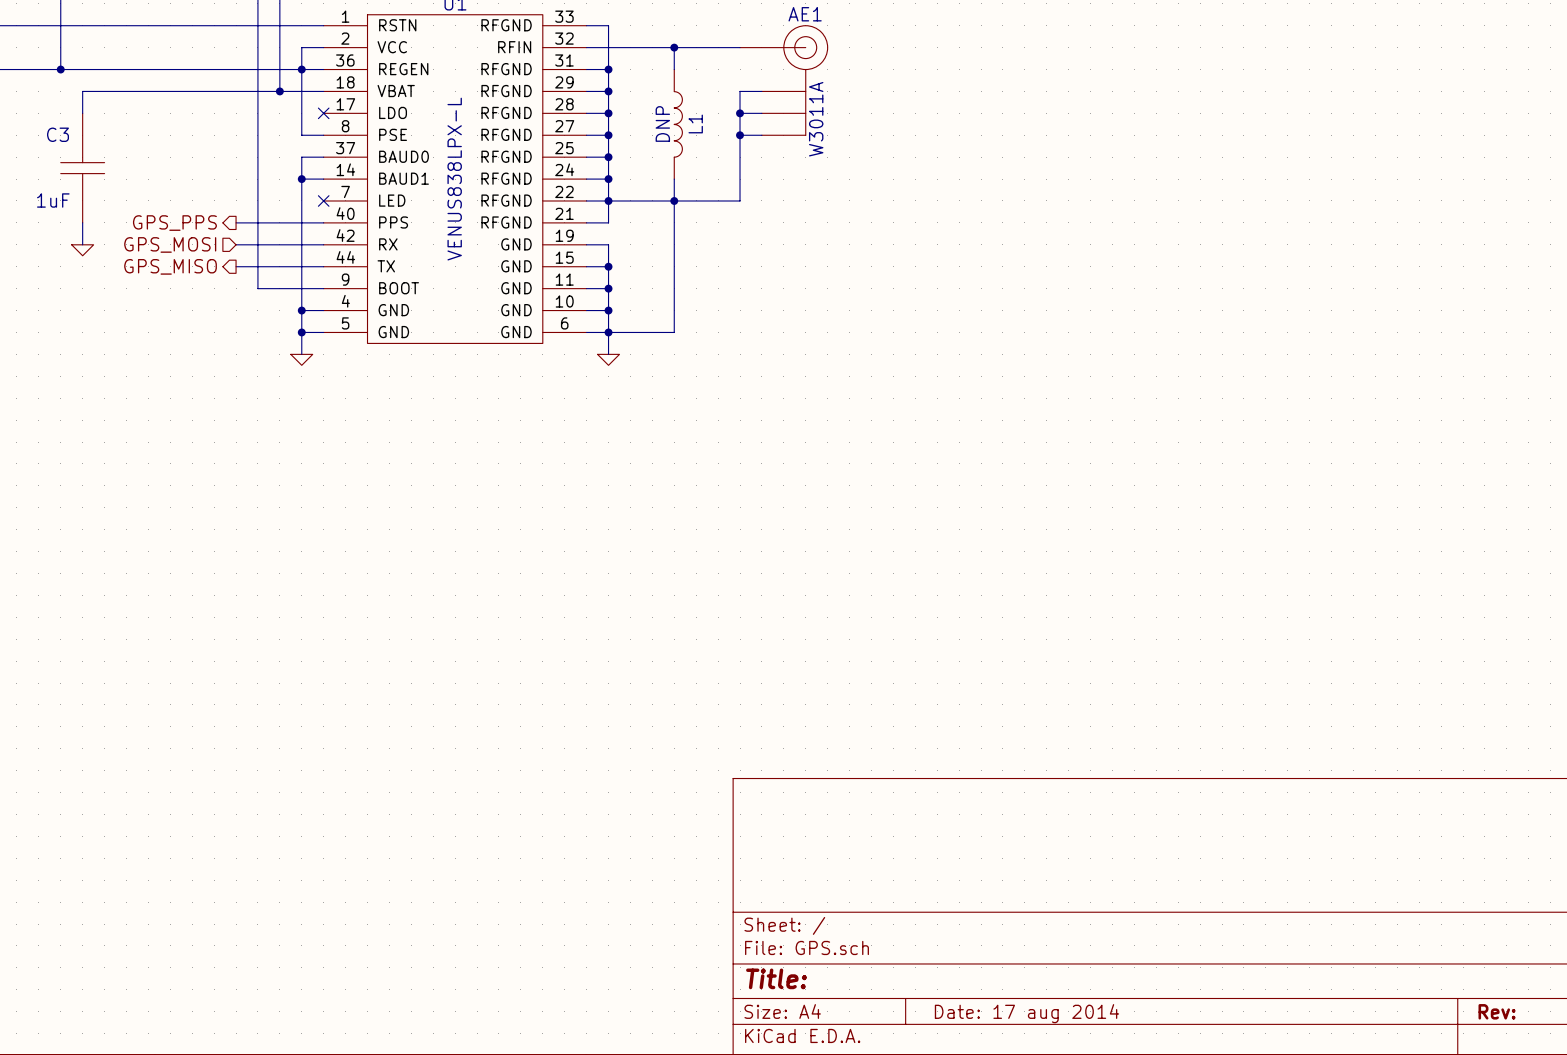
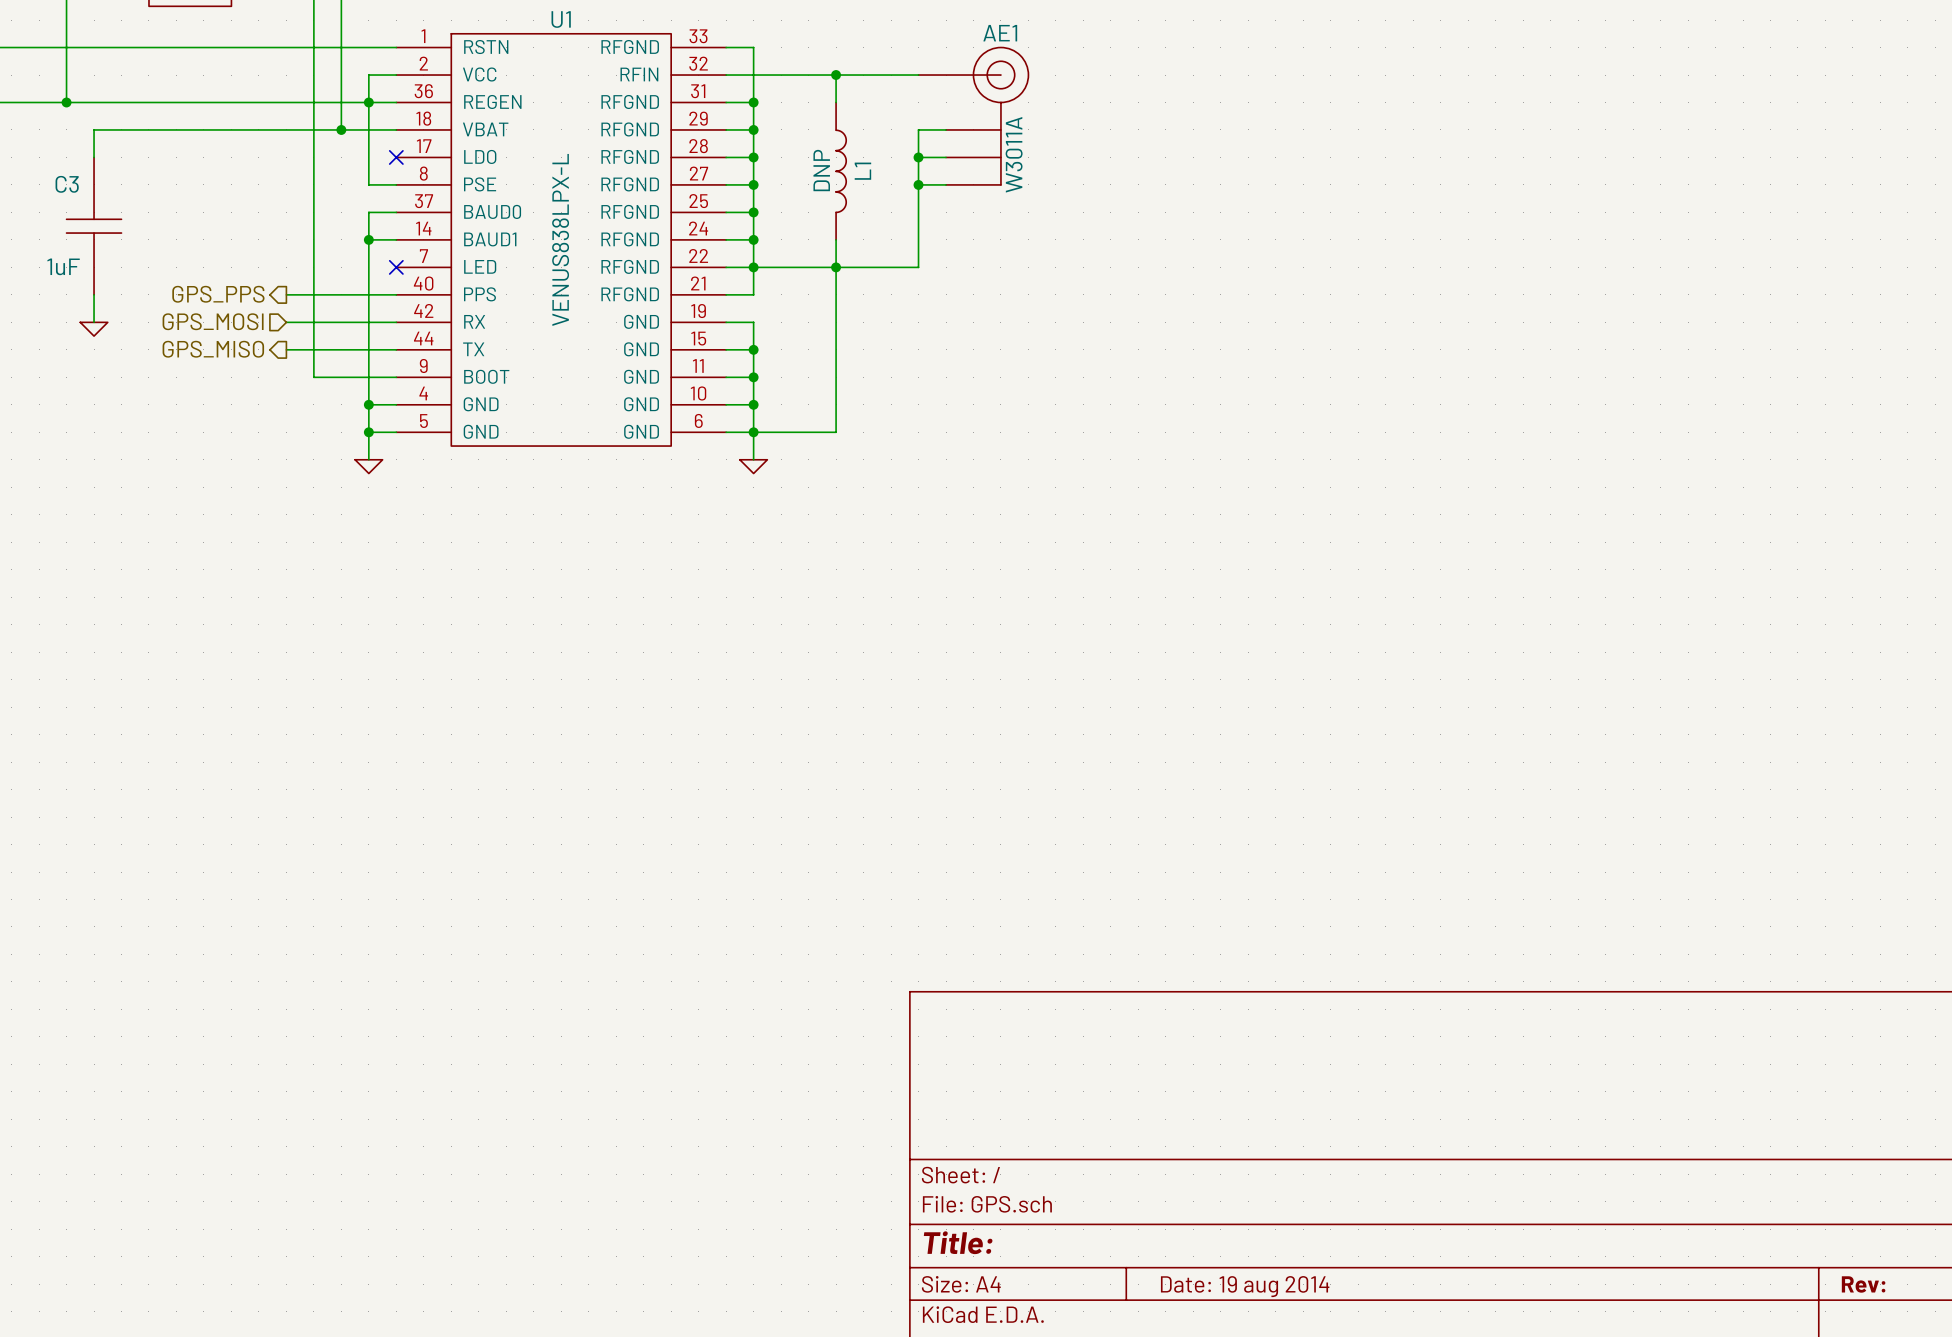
title block: Date: 17 aug 2014 (1026, 1013) -> Date: 19 aug 2014 (1245, 1286)

